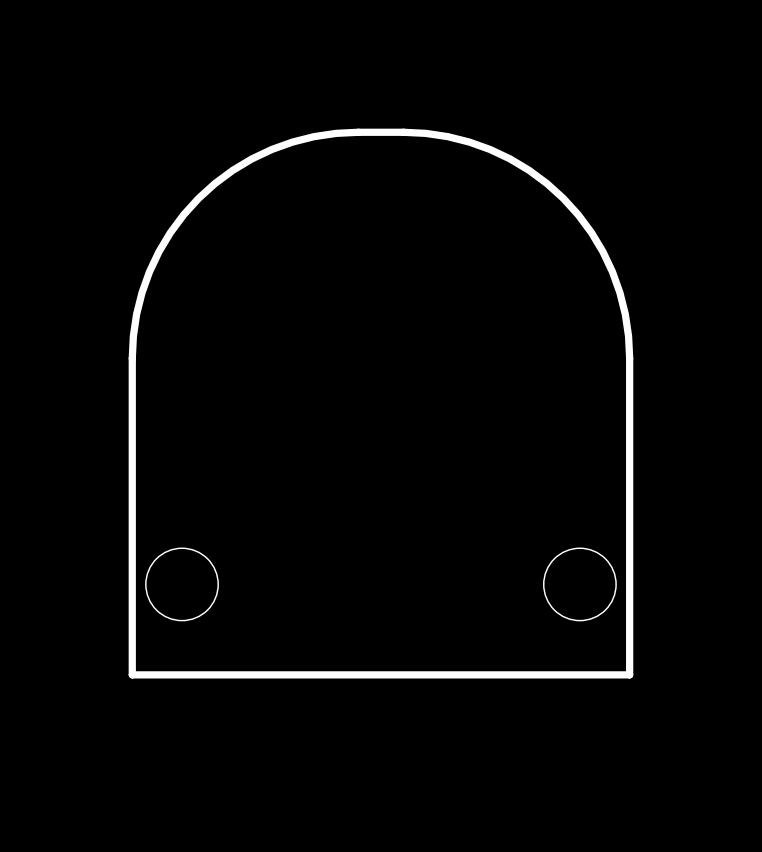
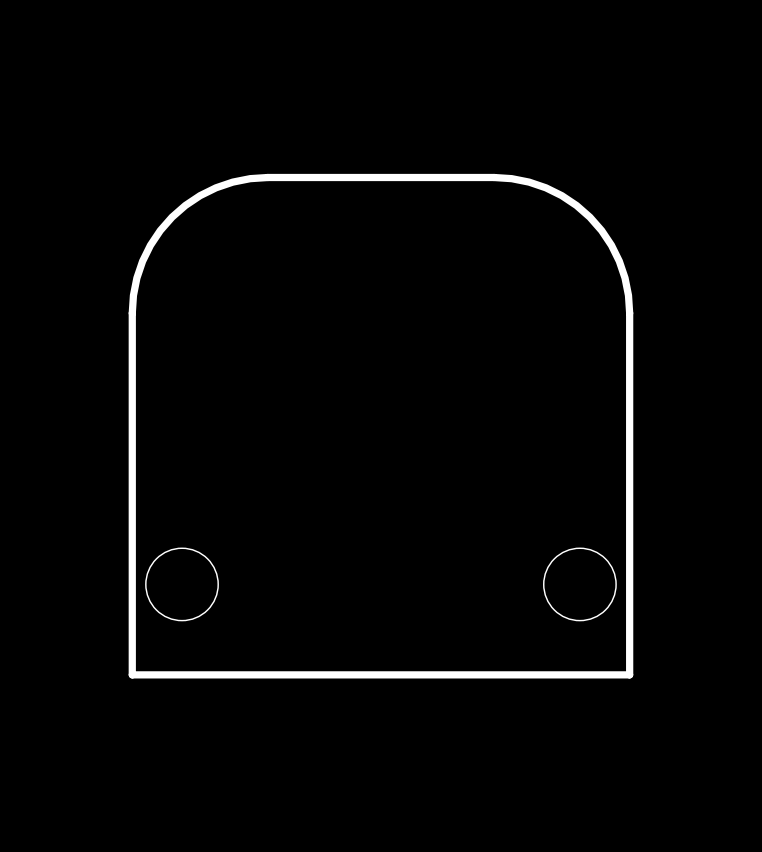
board edge: (629, 358) (625, 314) (612, 271) (591, 232) (563, 198) (529, 170) (490, 149) (447, 136) (403, 132) (336, 133) (292, 142) (251, 158) (214, 183) (183, 214) (158, 251) (142, 292) (136, 314) (132, 358) -> (629, 358) (629, 313) (625, 278) (611, 245) (601, 230) (589, 217) (561, 195) (529, 182) (494, 177) (267, 177) (232, 182) (200, 195) (172, 217) (160, 230) (142, 261) (133, 295) (132, 358)

